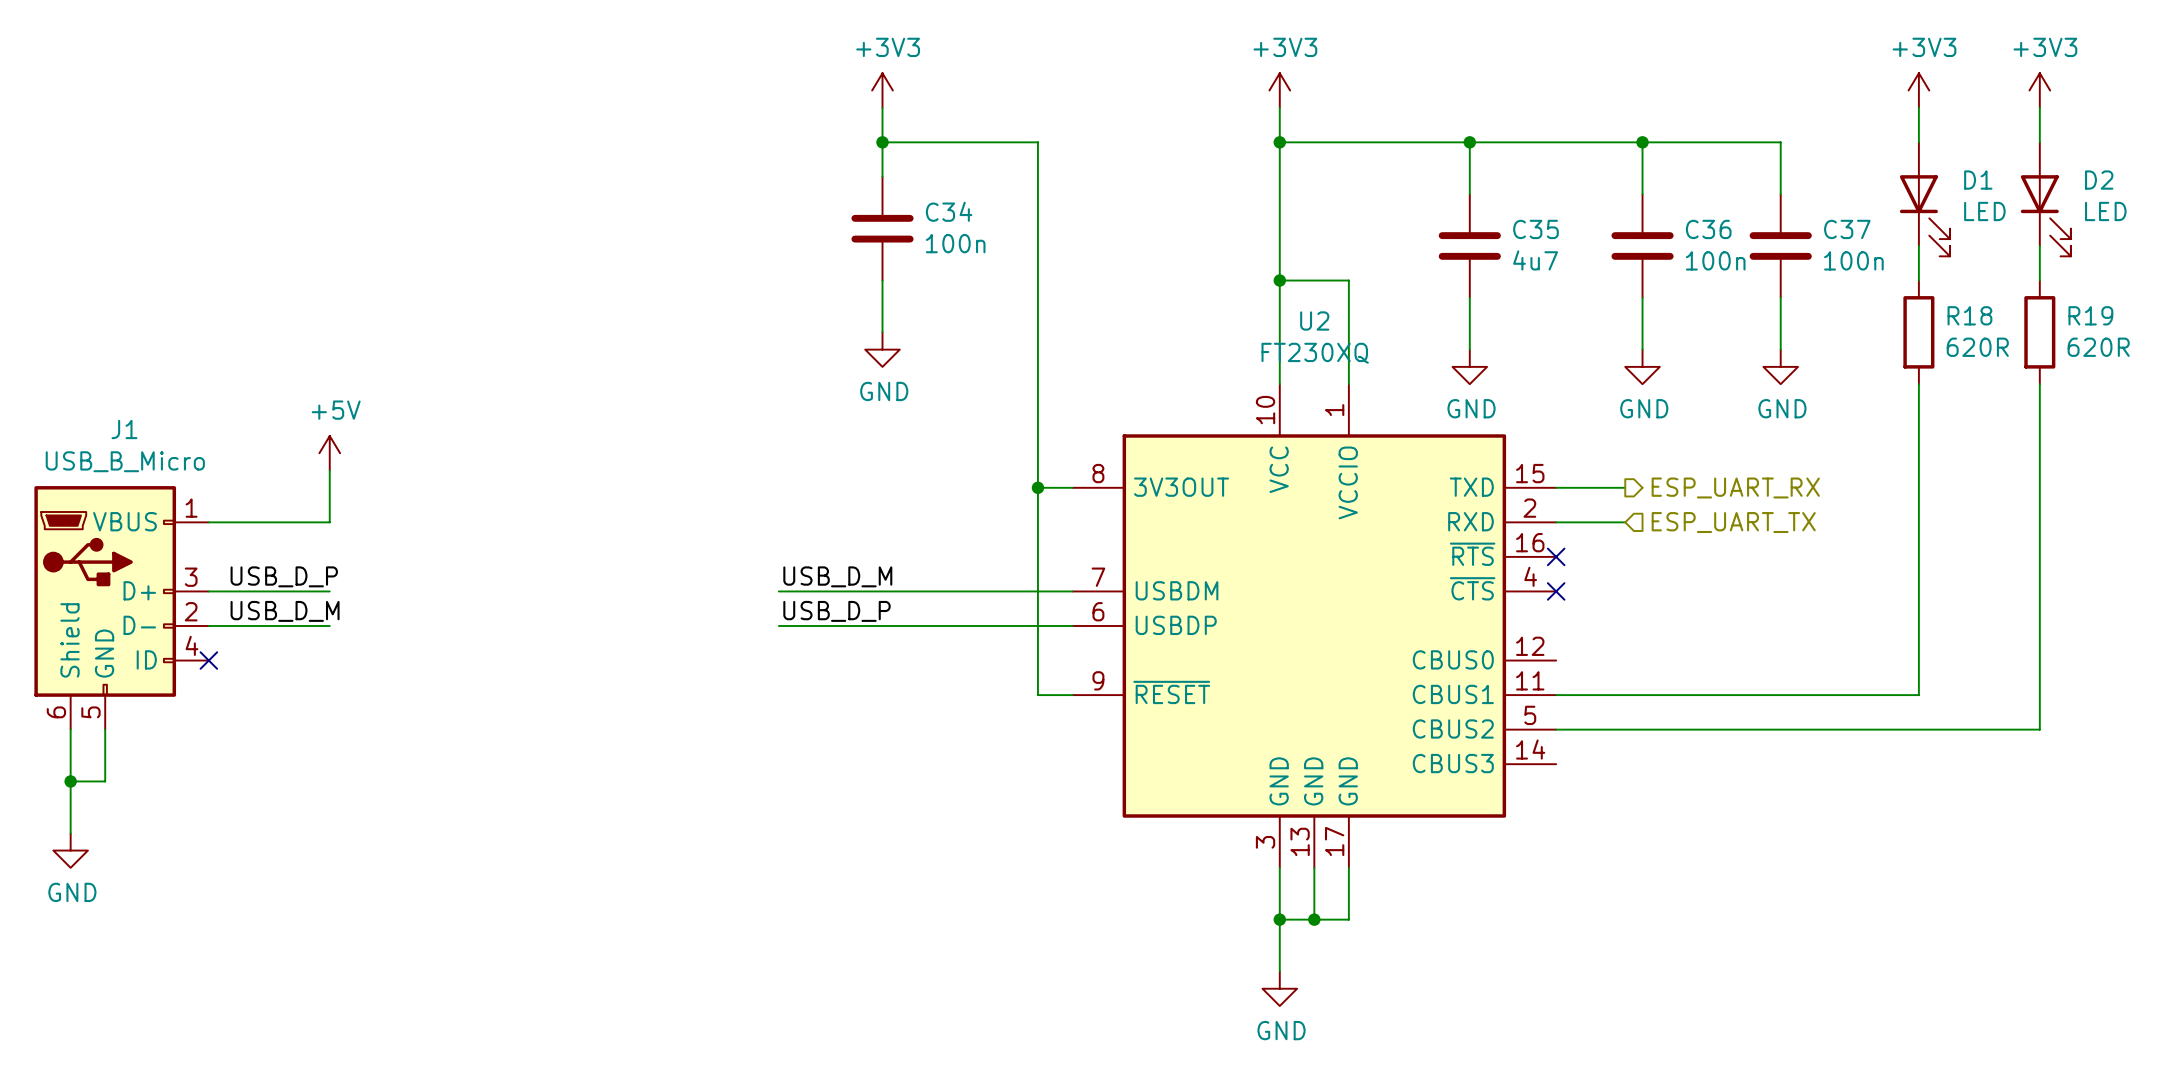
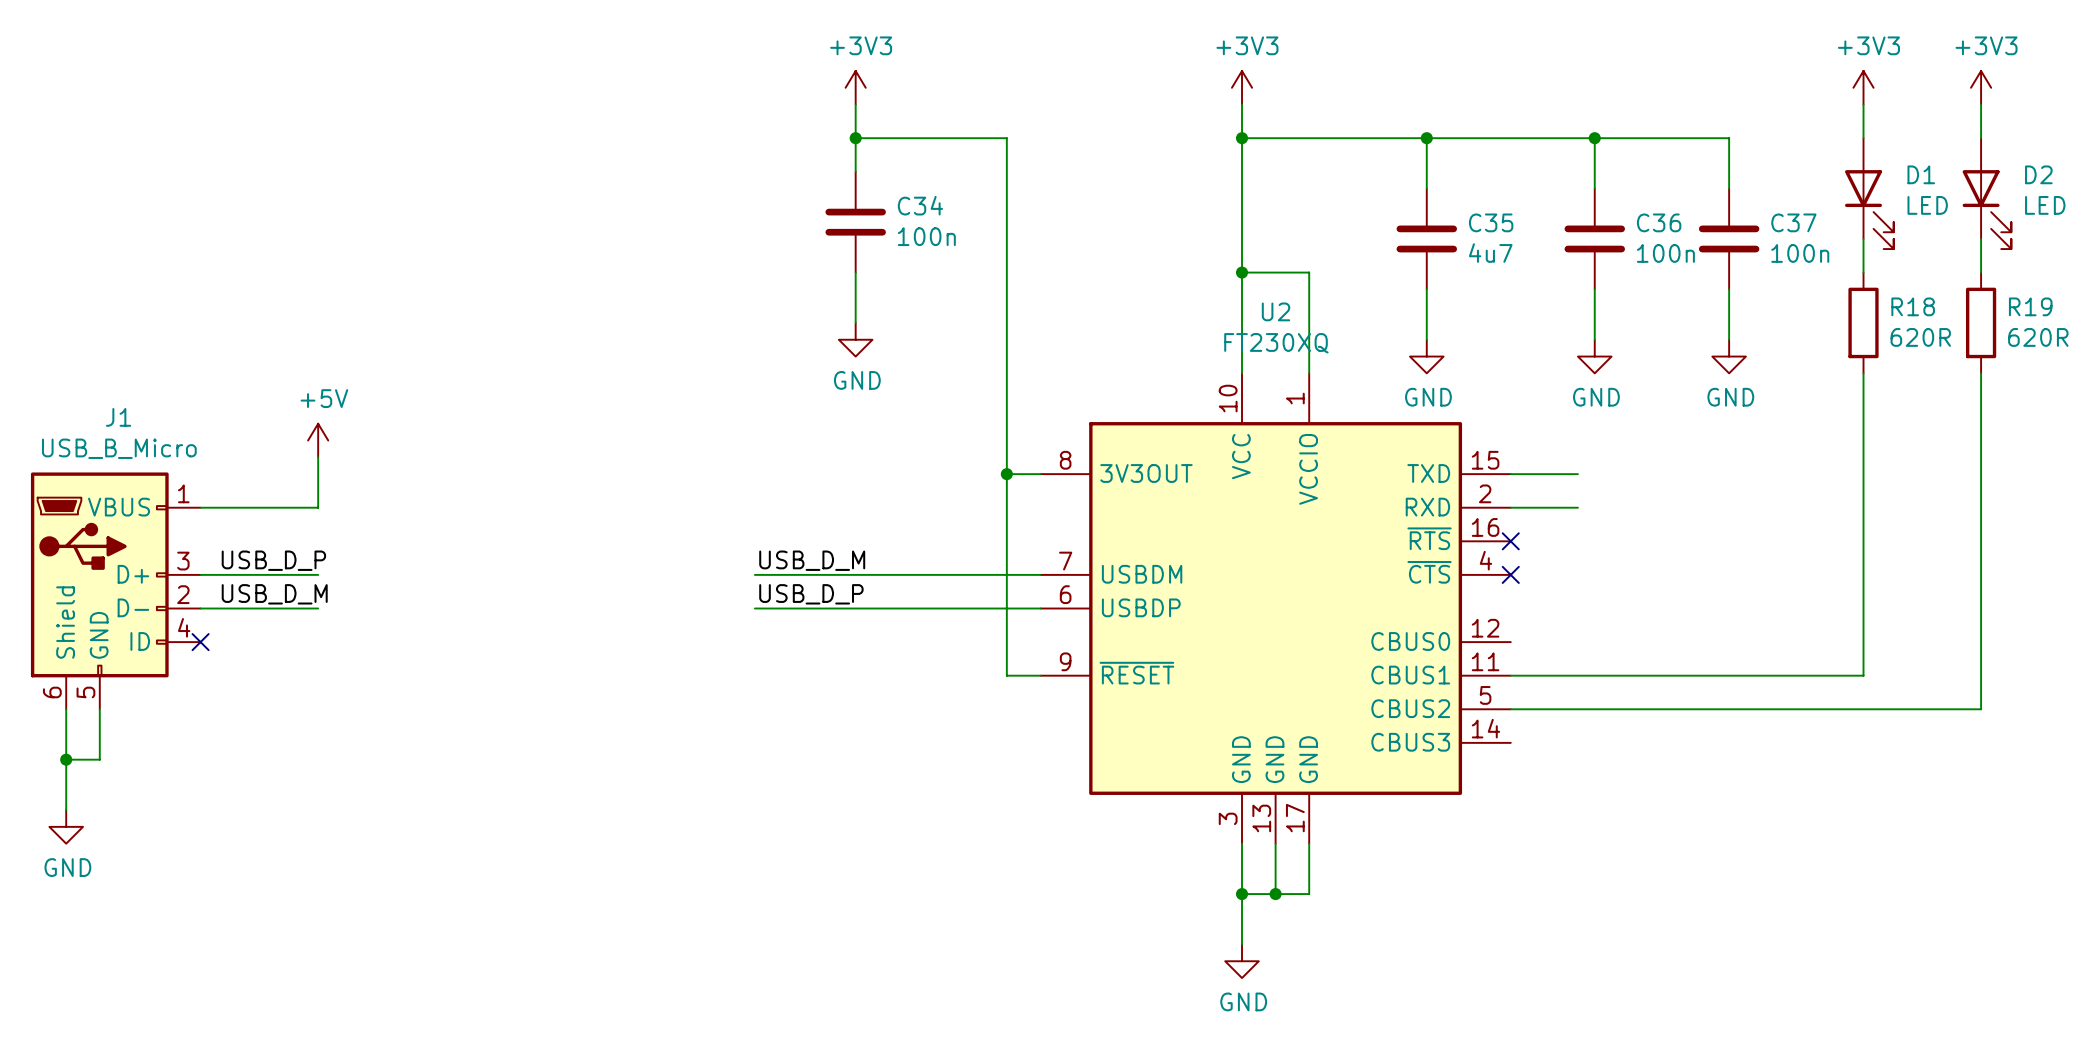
hierarchical label: ESP_UART_RX (1735, 487) -> none
hierarchical label: ESP_UART_TX (1733, 522) -> none

